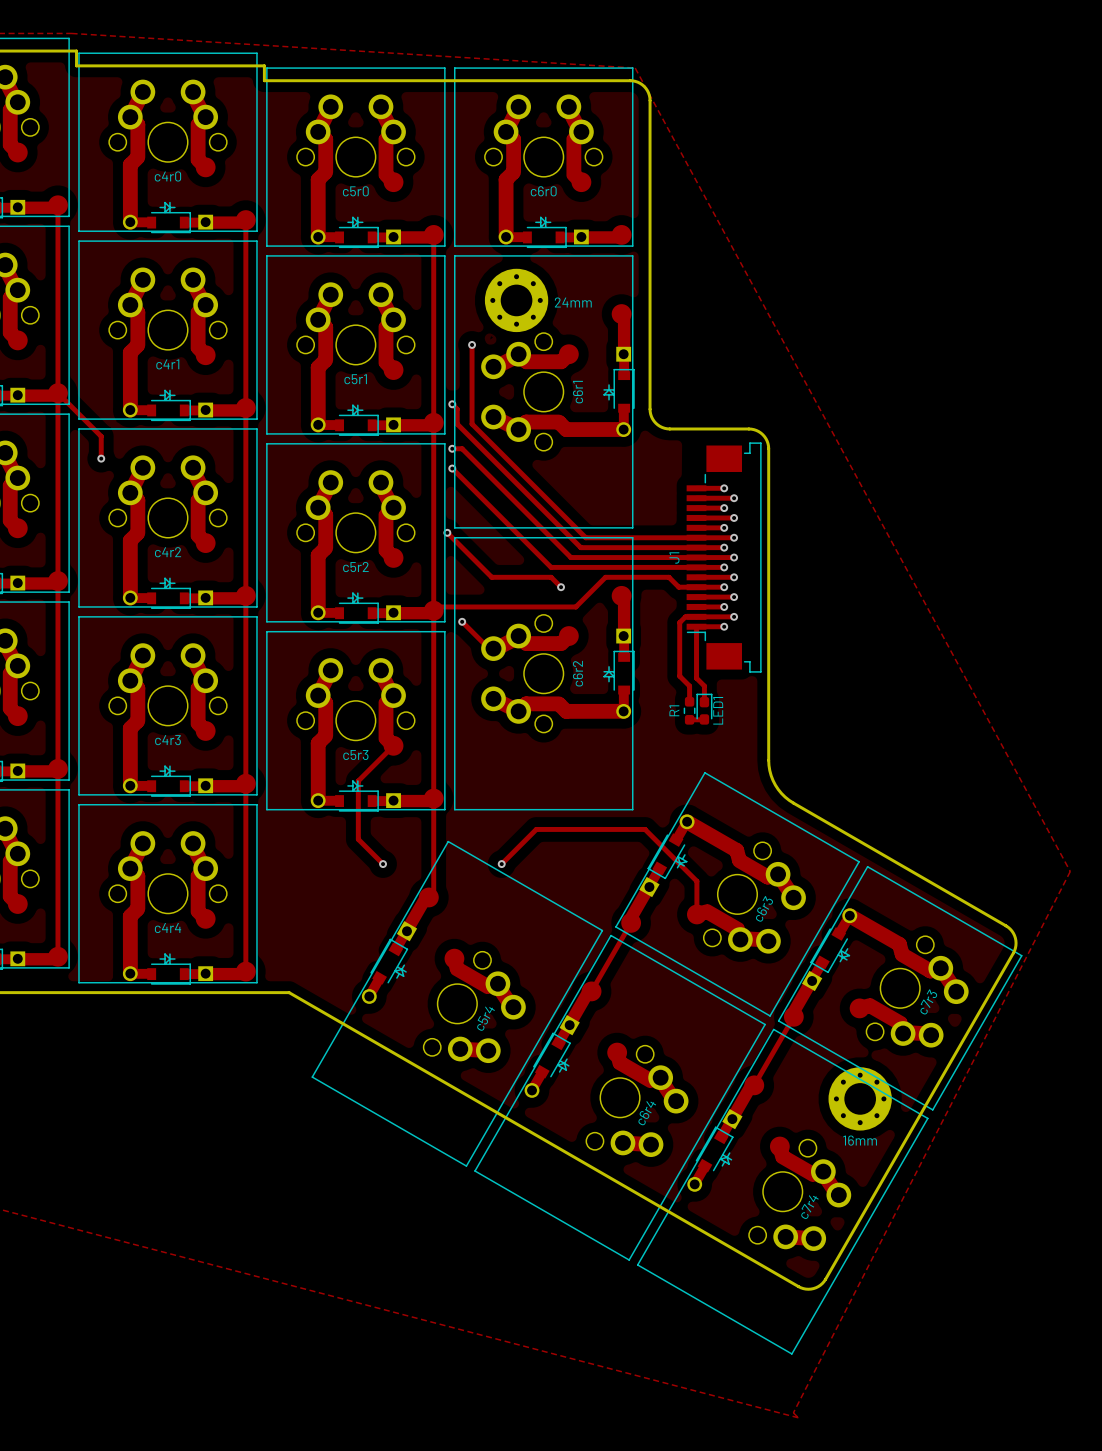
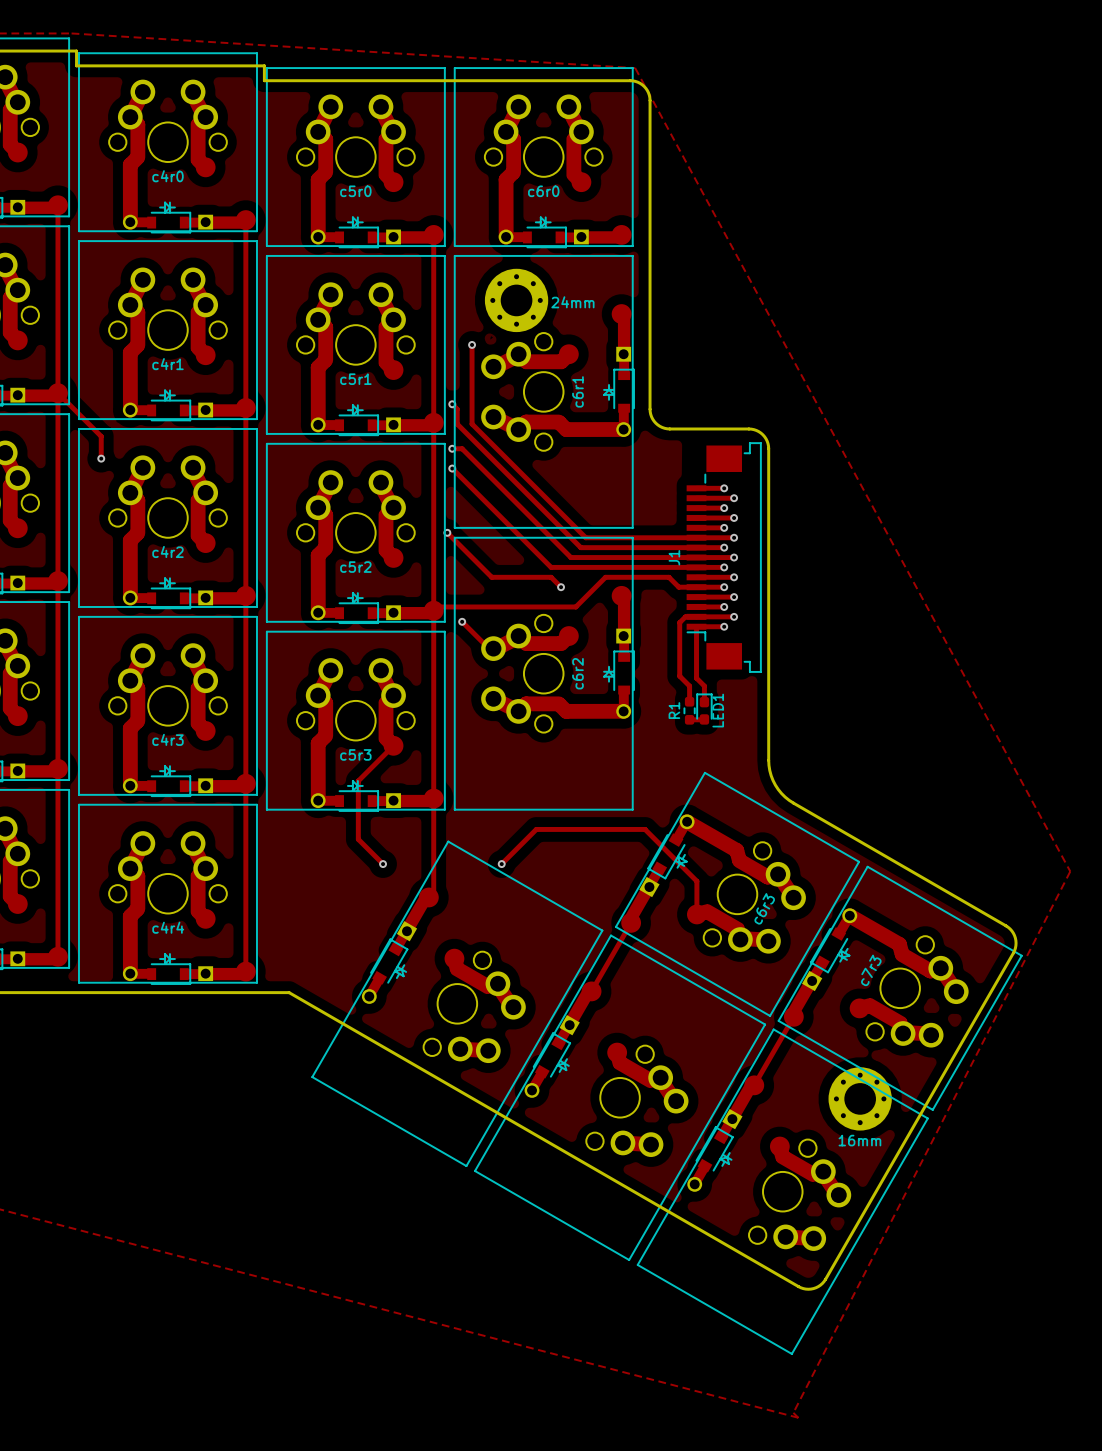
c7r3 name position: c7r3 (928, 1001) -> c7r3 (871, 970)
c5r4 name: c5r4 (486, 1018) -> none
c6r4 name: c6r4 (647, 1113) -> none
c7r4 name: c7r4 (809, 1207) -> none

